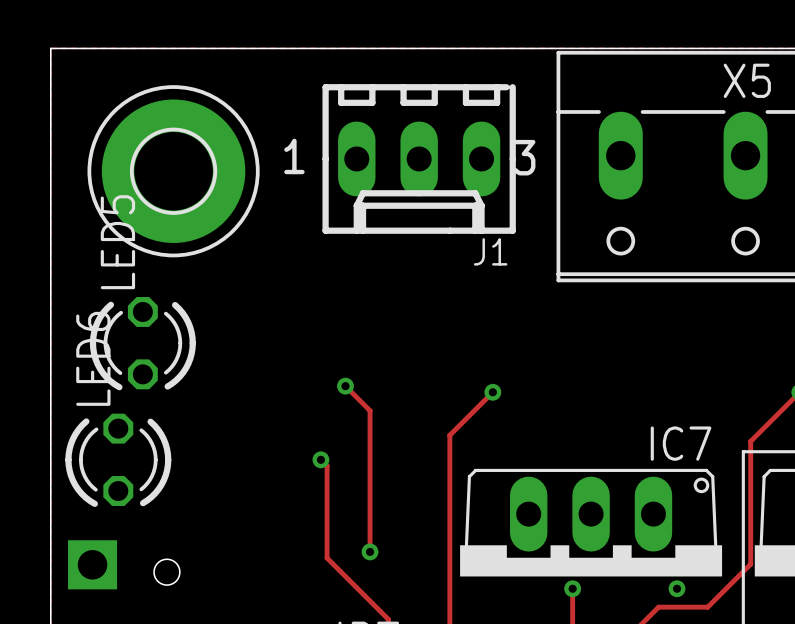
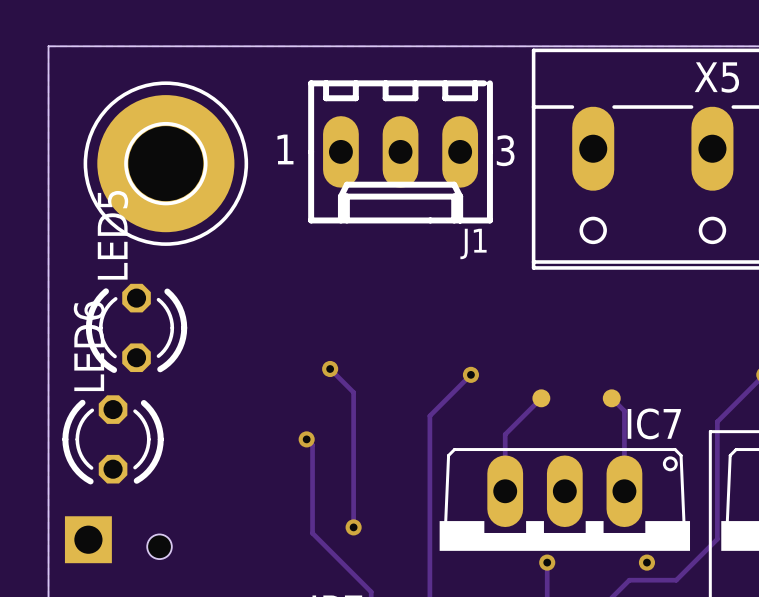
track: none -> (541, 398) (505, 434) (505, 491)
part: none -> (541, 398)
track: none -> (611, 398) (624, 410) (624, 491)
part: none -> (611, 398)

